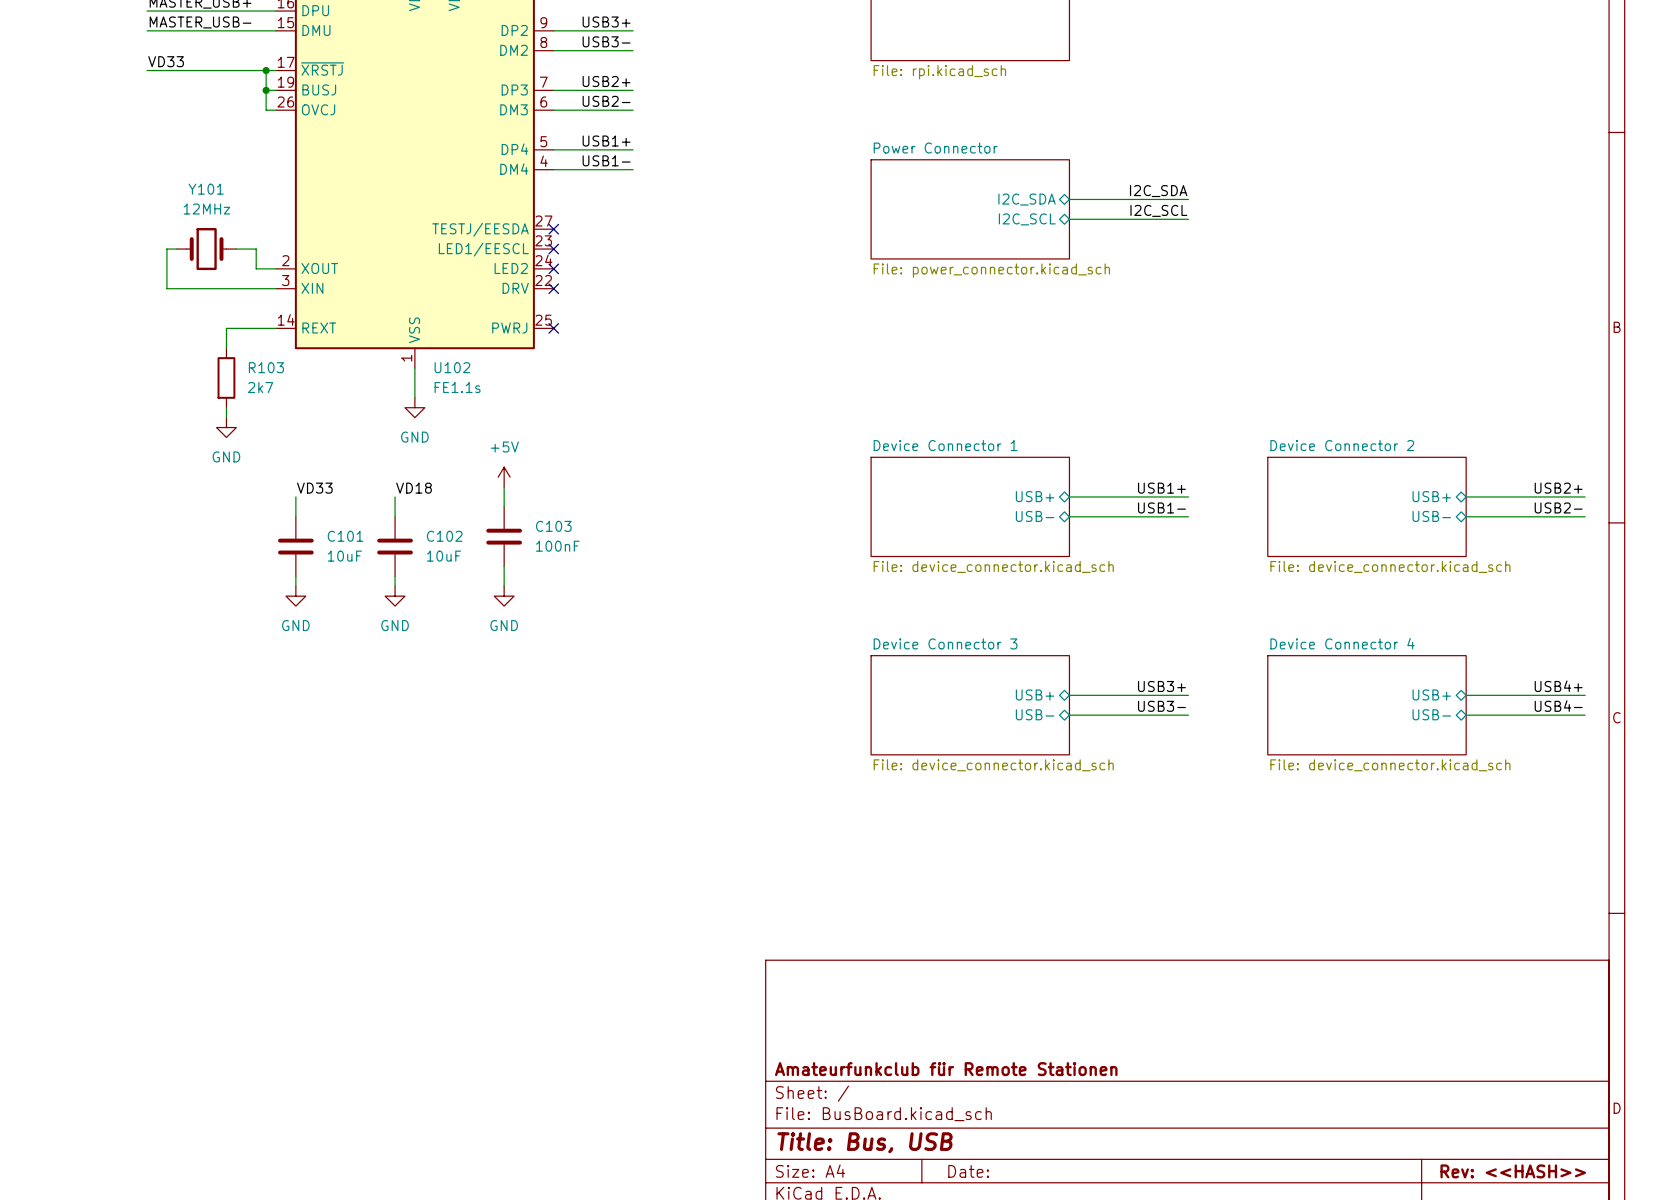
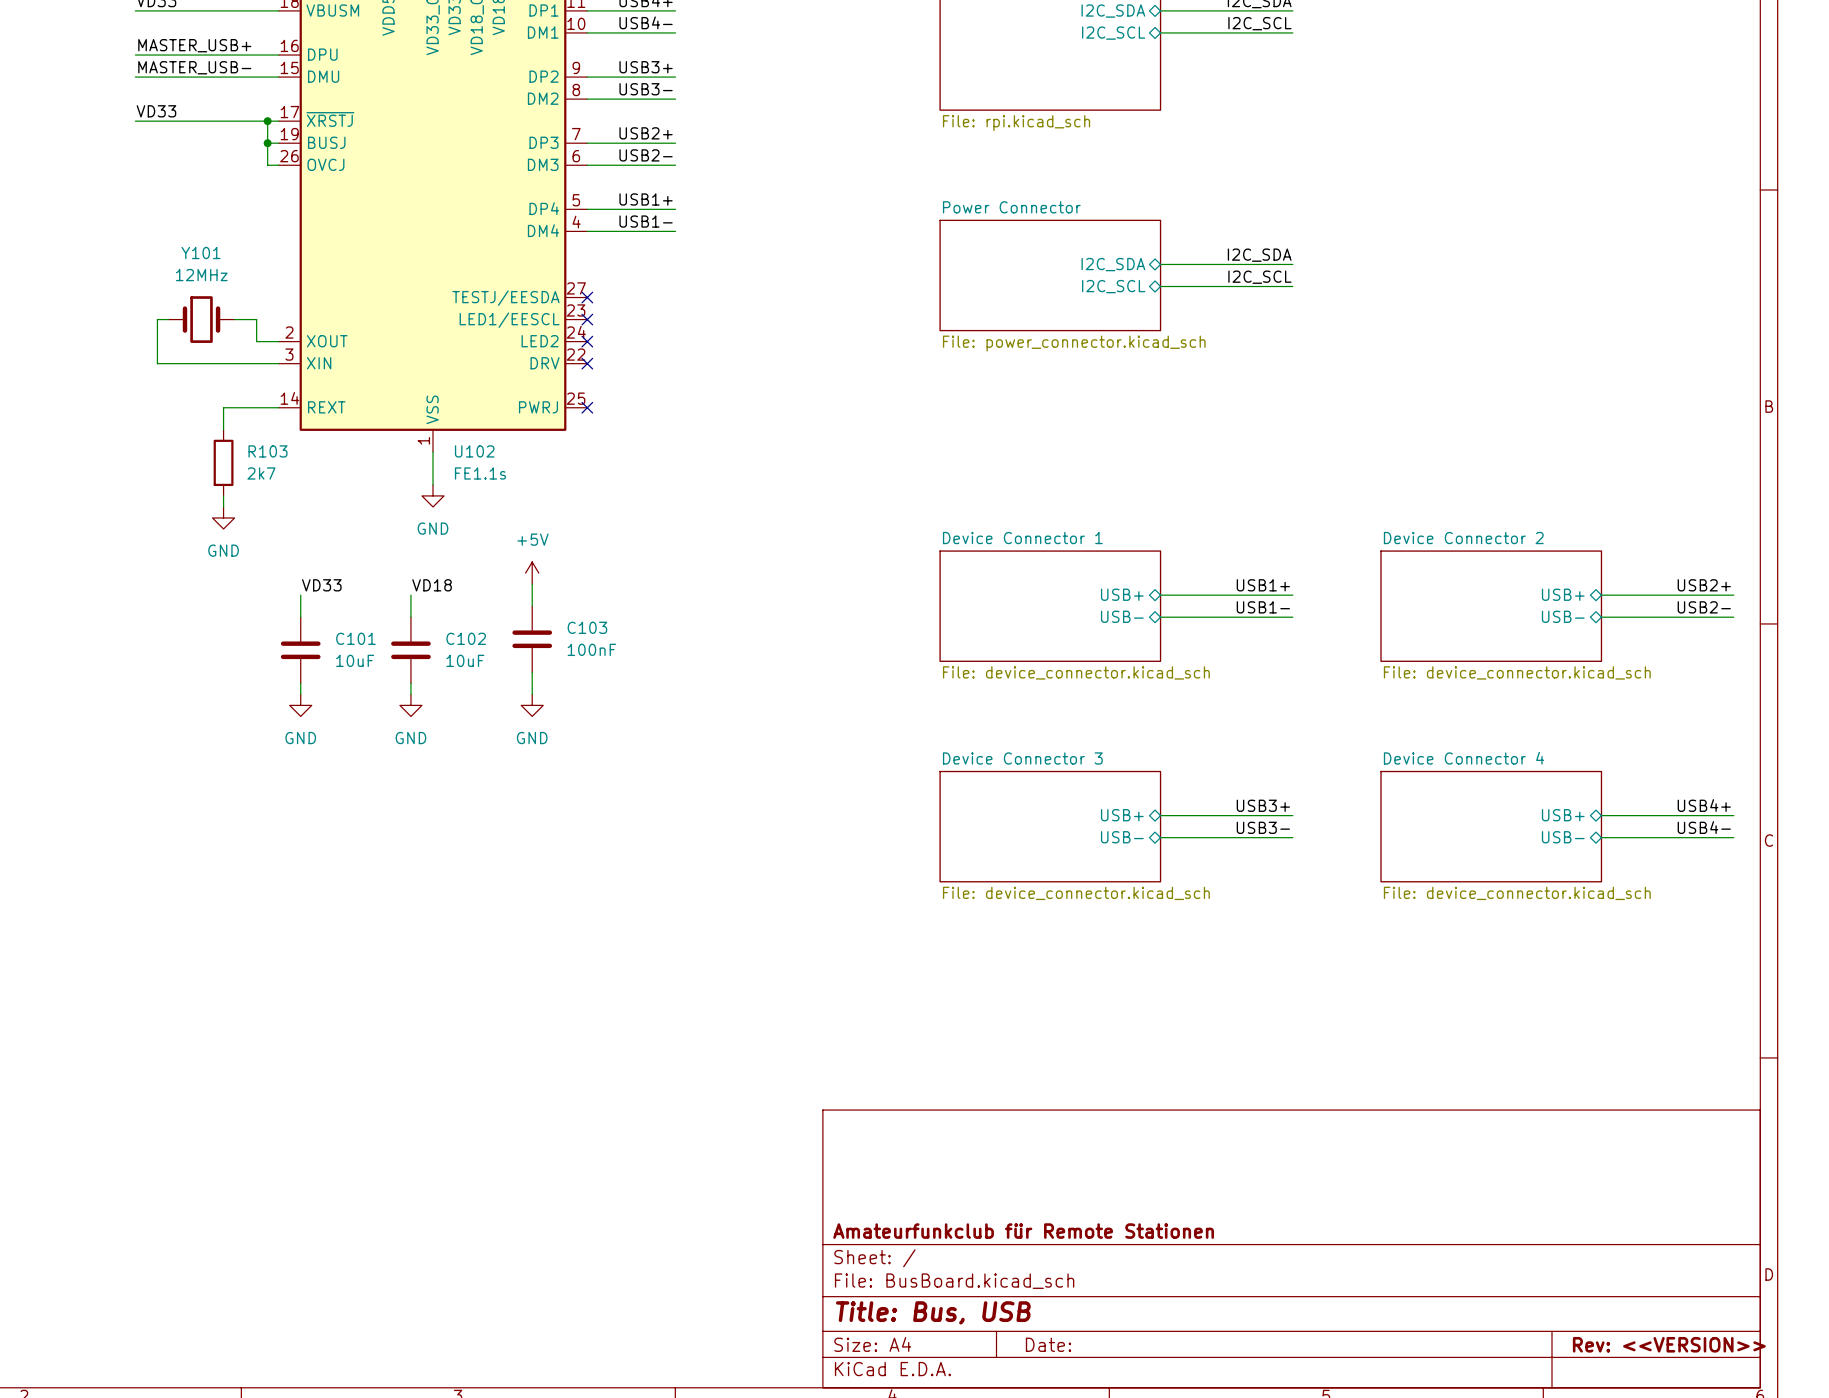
title block: Rev: <<HASH>> (1513, 1171) -> Rev: <<VERSION>> (1669, 1344)

